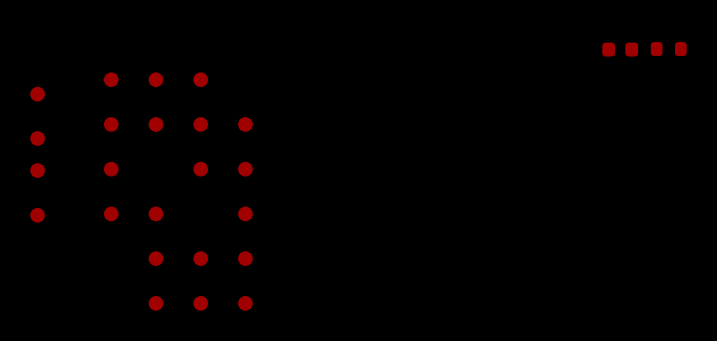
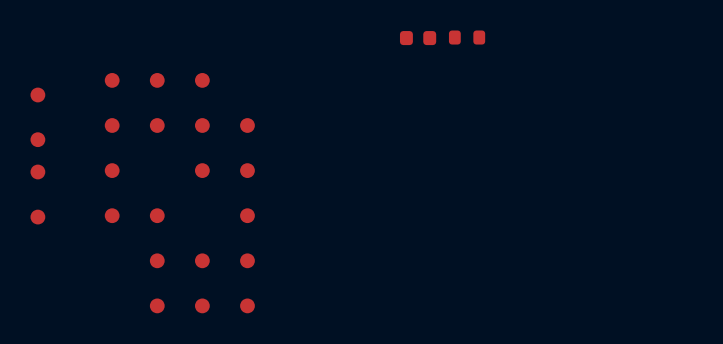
part position: (620, 49) -> (418, 38)
part position: (668, 49) -> (467, 37)

